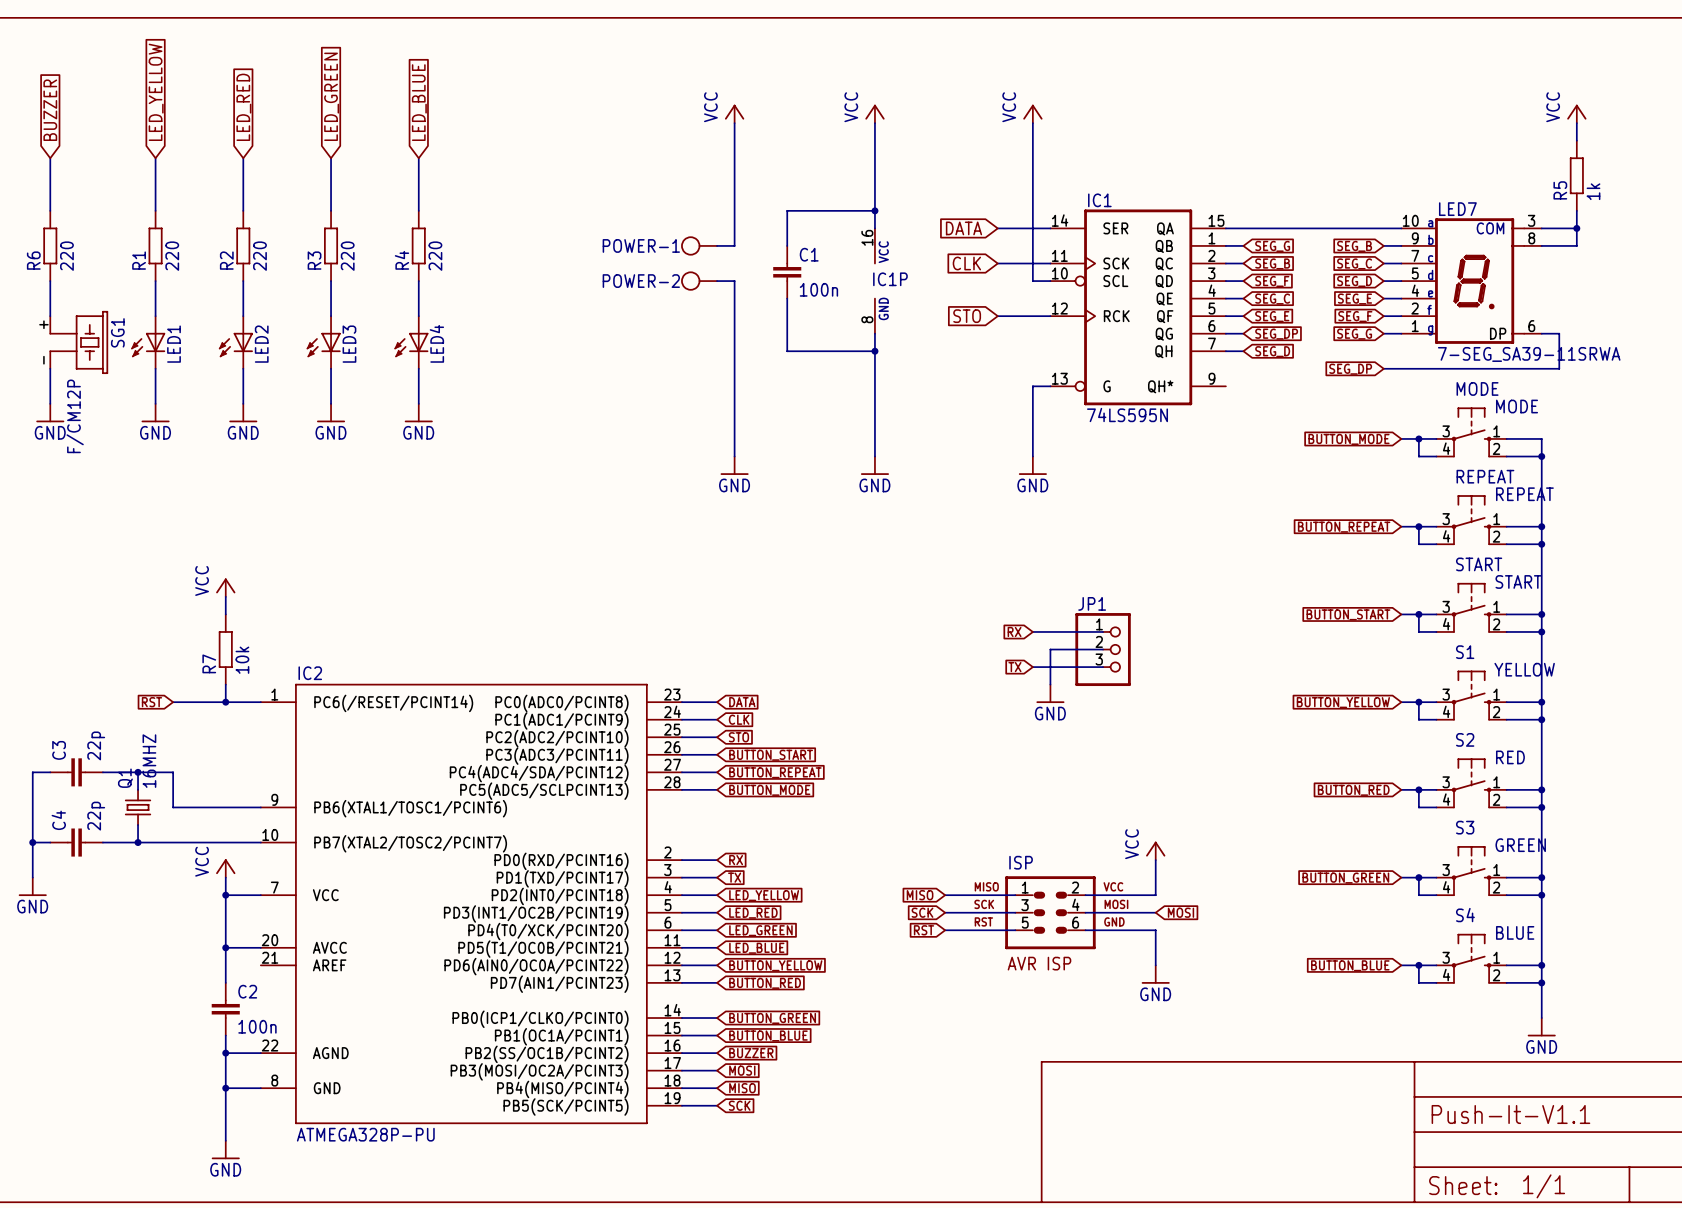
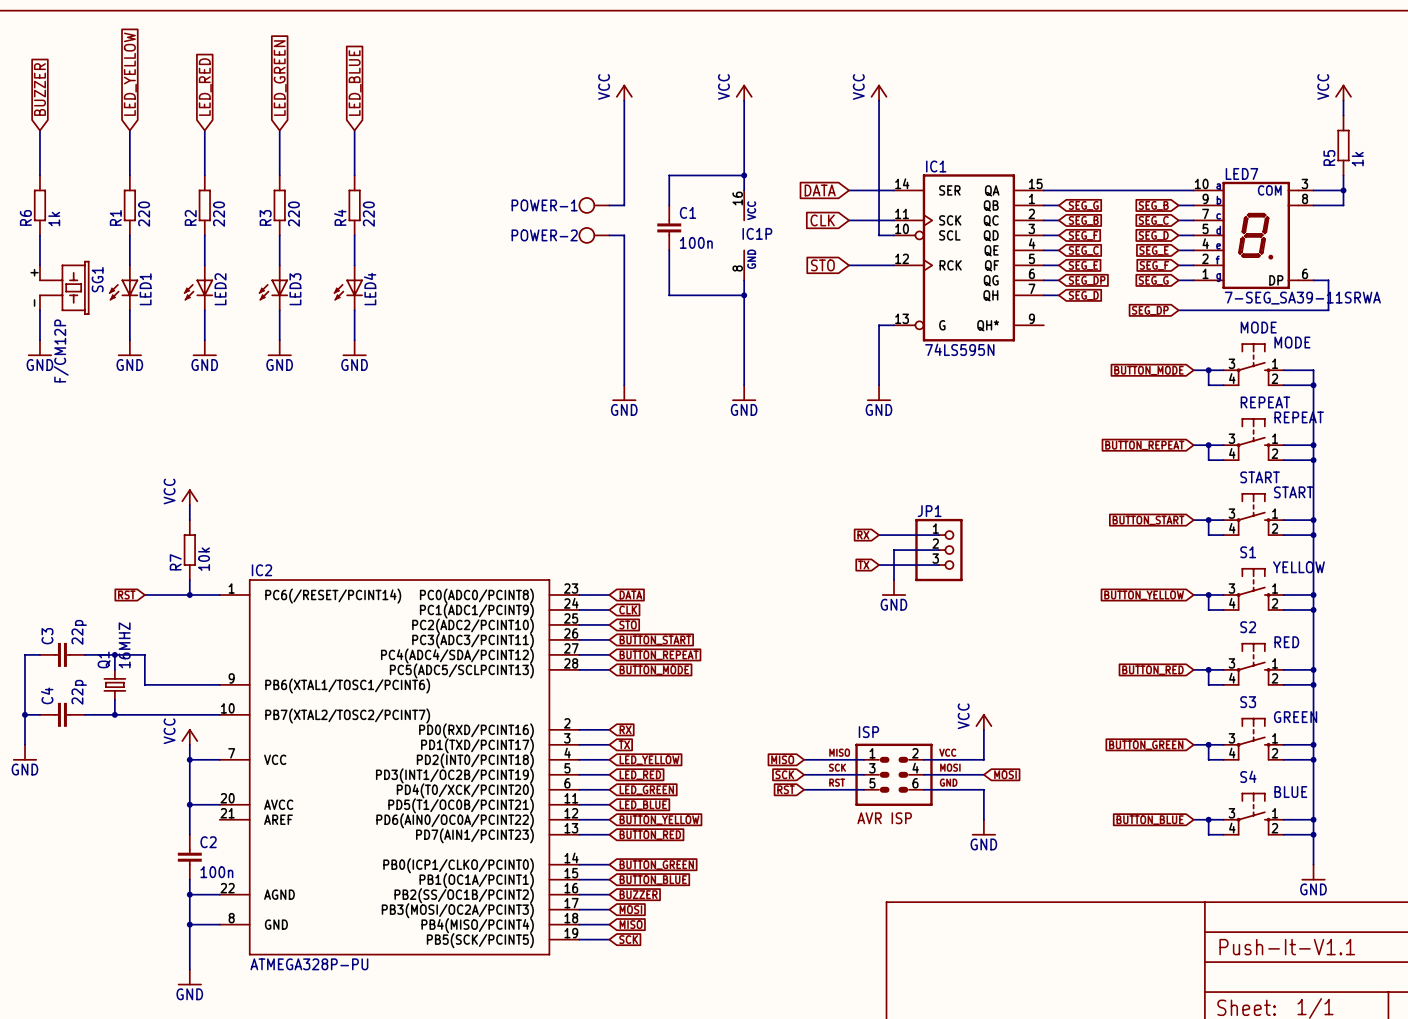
R6 value: 220 (66, 256) -> 1k (54, 219)

